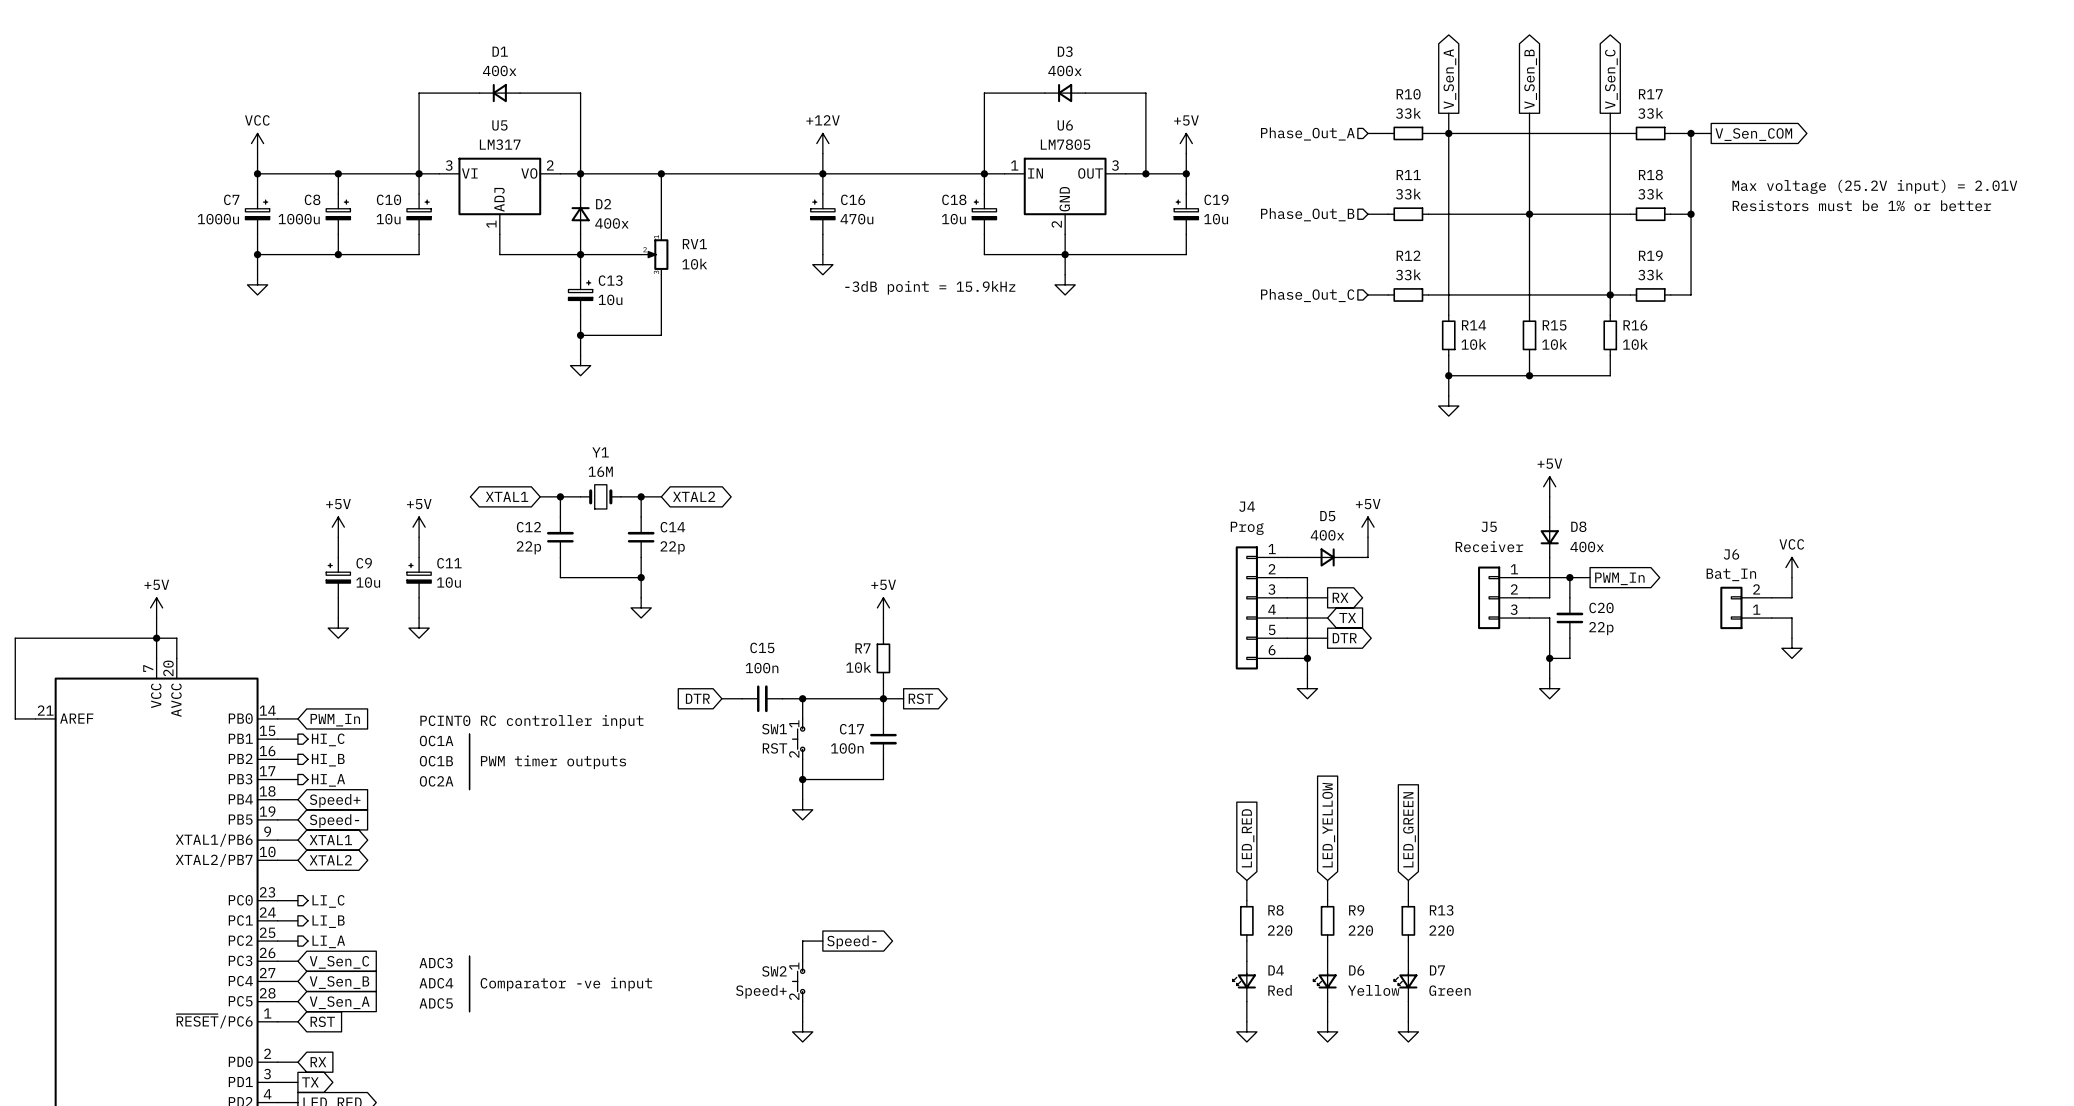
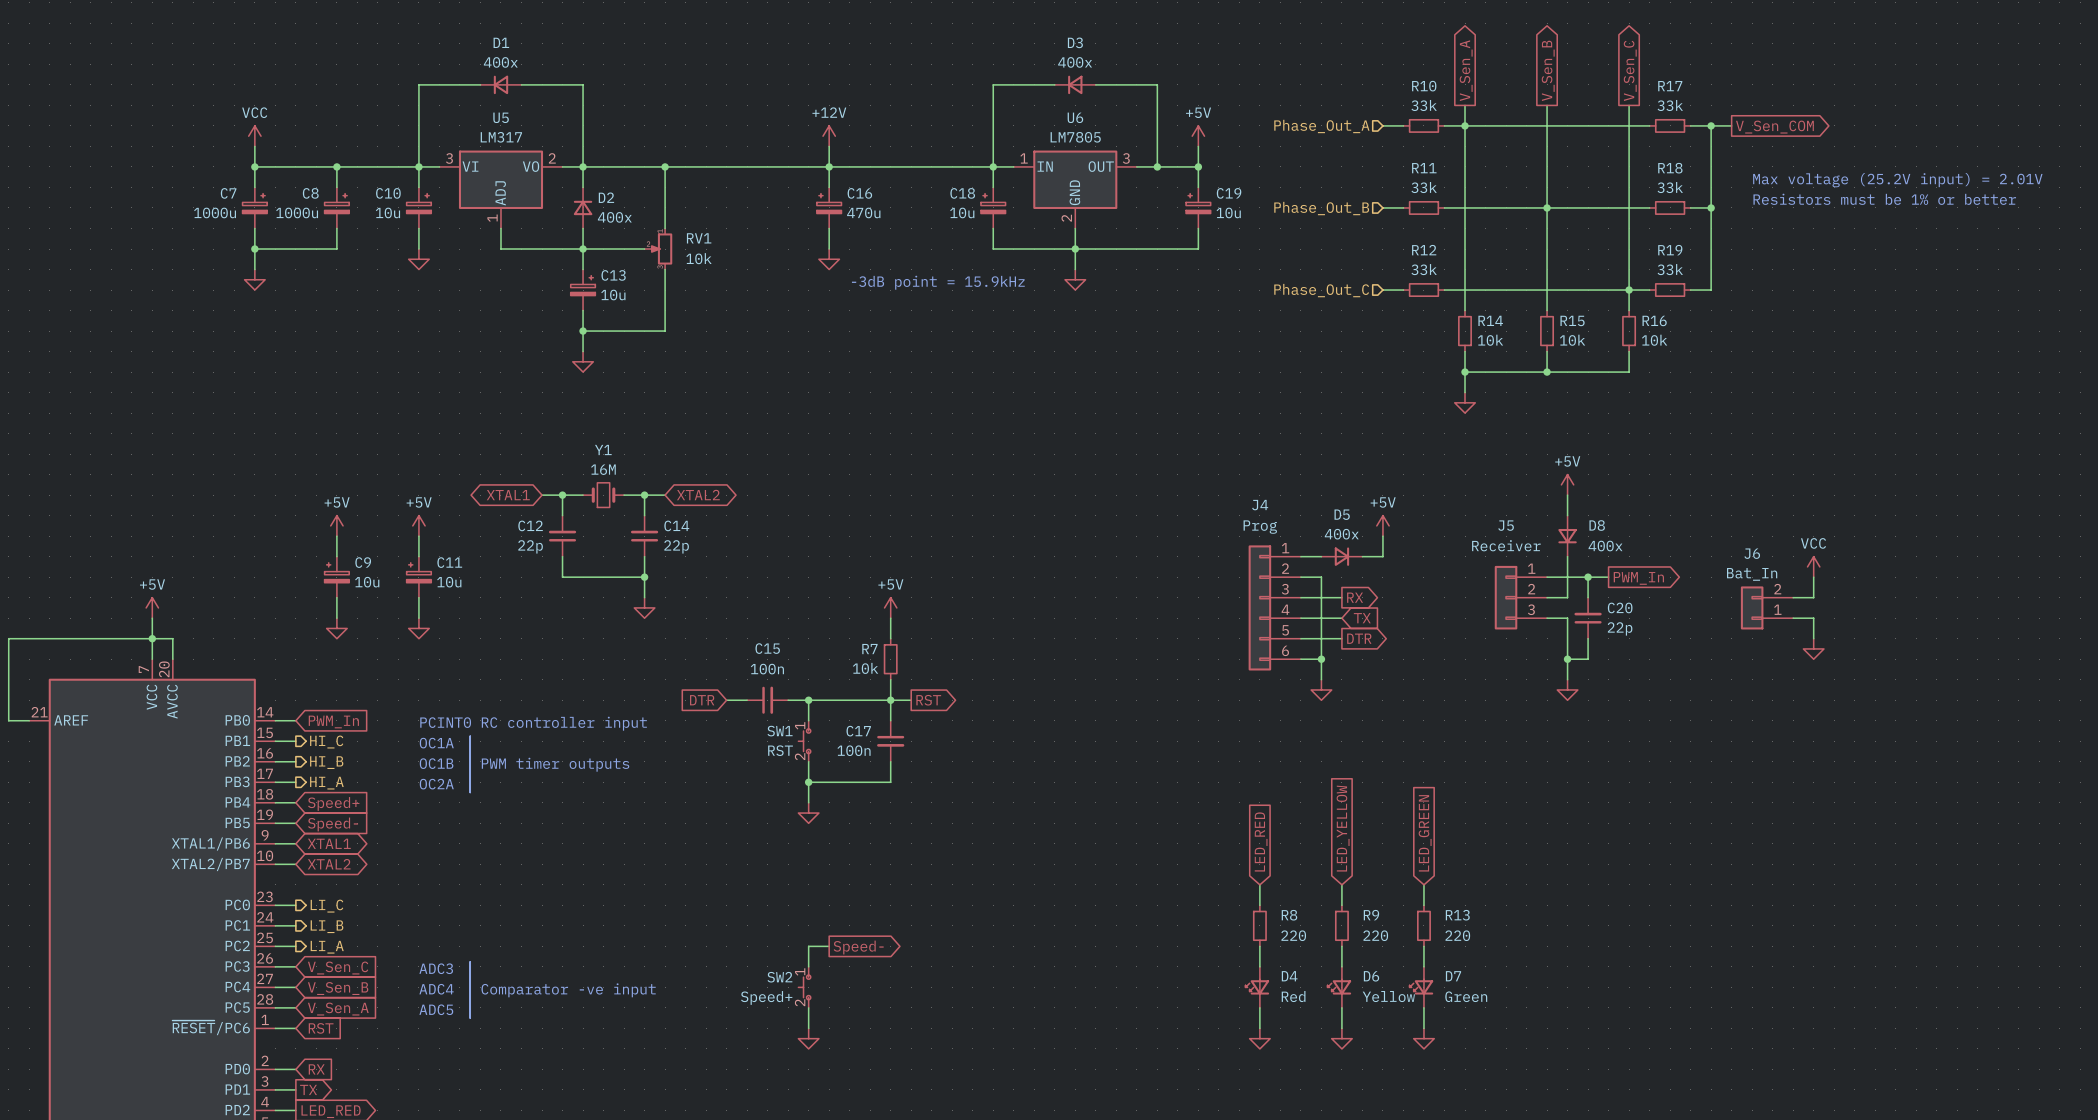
wire: (338, 254) (419, 254) -> none
junction: (338, 254) -> none
power symbol: none -> (418, 259)

